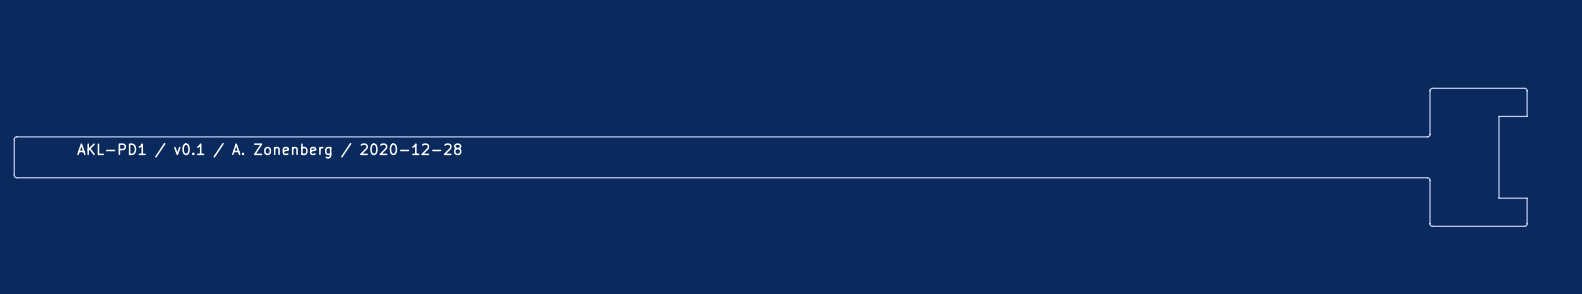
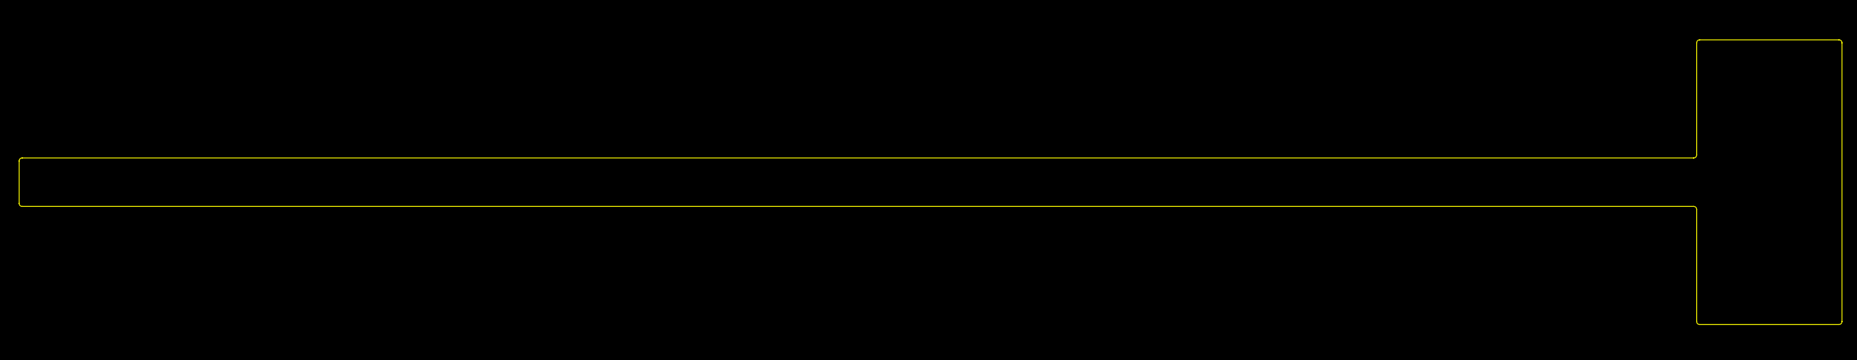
board edge: (1430, 90) (1432, 88) (1524, 88) (1527, 90) (1527, 116) (1499, 116) (1499, 198) (1527, 198) (1526, 225) (1432, 226) (1430, 223) -> (1696, 103) (1696, 42) (1698, 40) (1838, 39) (1841, 41) (1841, 322) (1698, 324) (1696, 321) (1696, 260)
text: AKL-PD1 / v0.1 / A. Zonenberg / 2020-12-28 (269, 150) -> none

